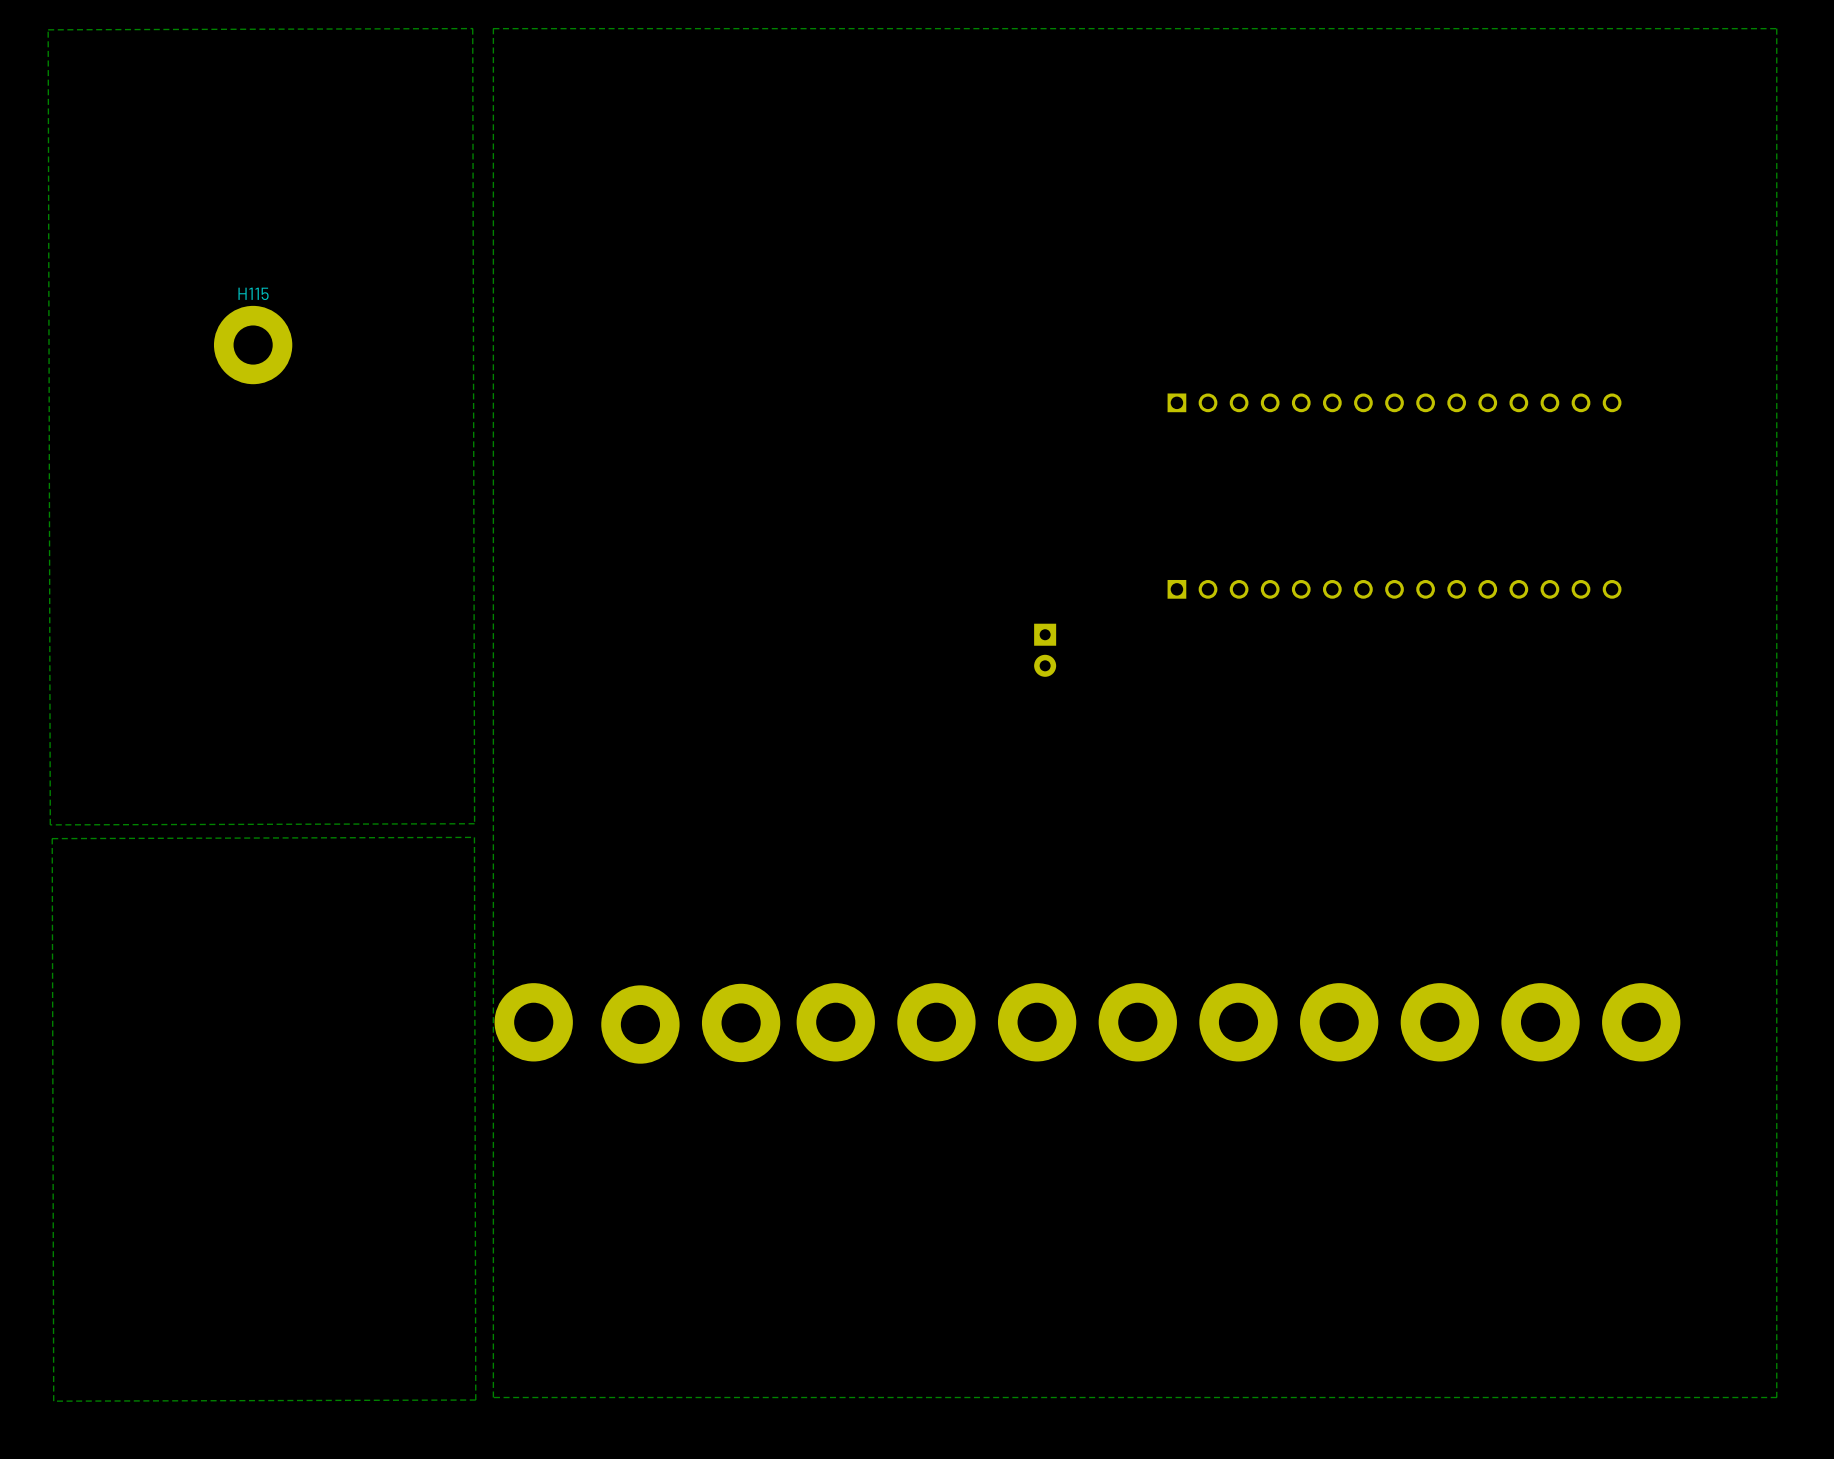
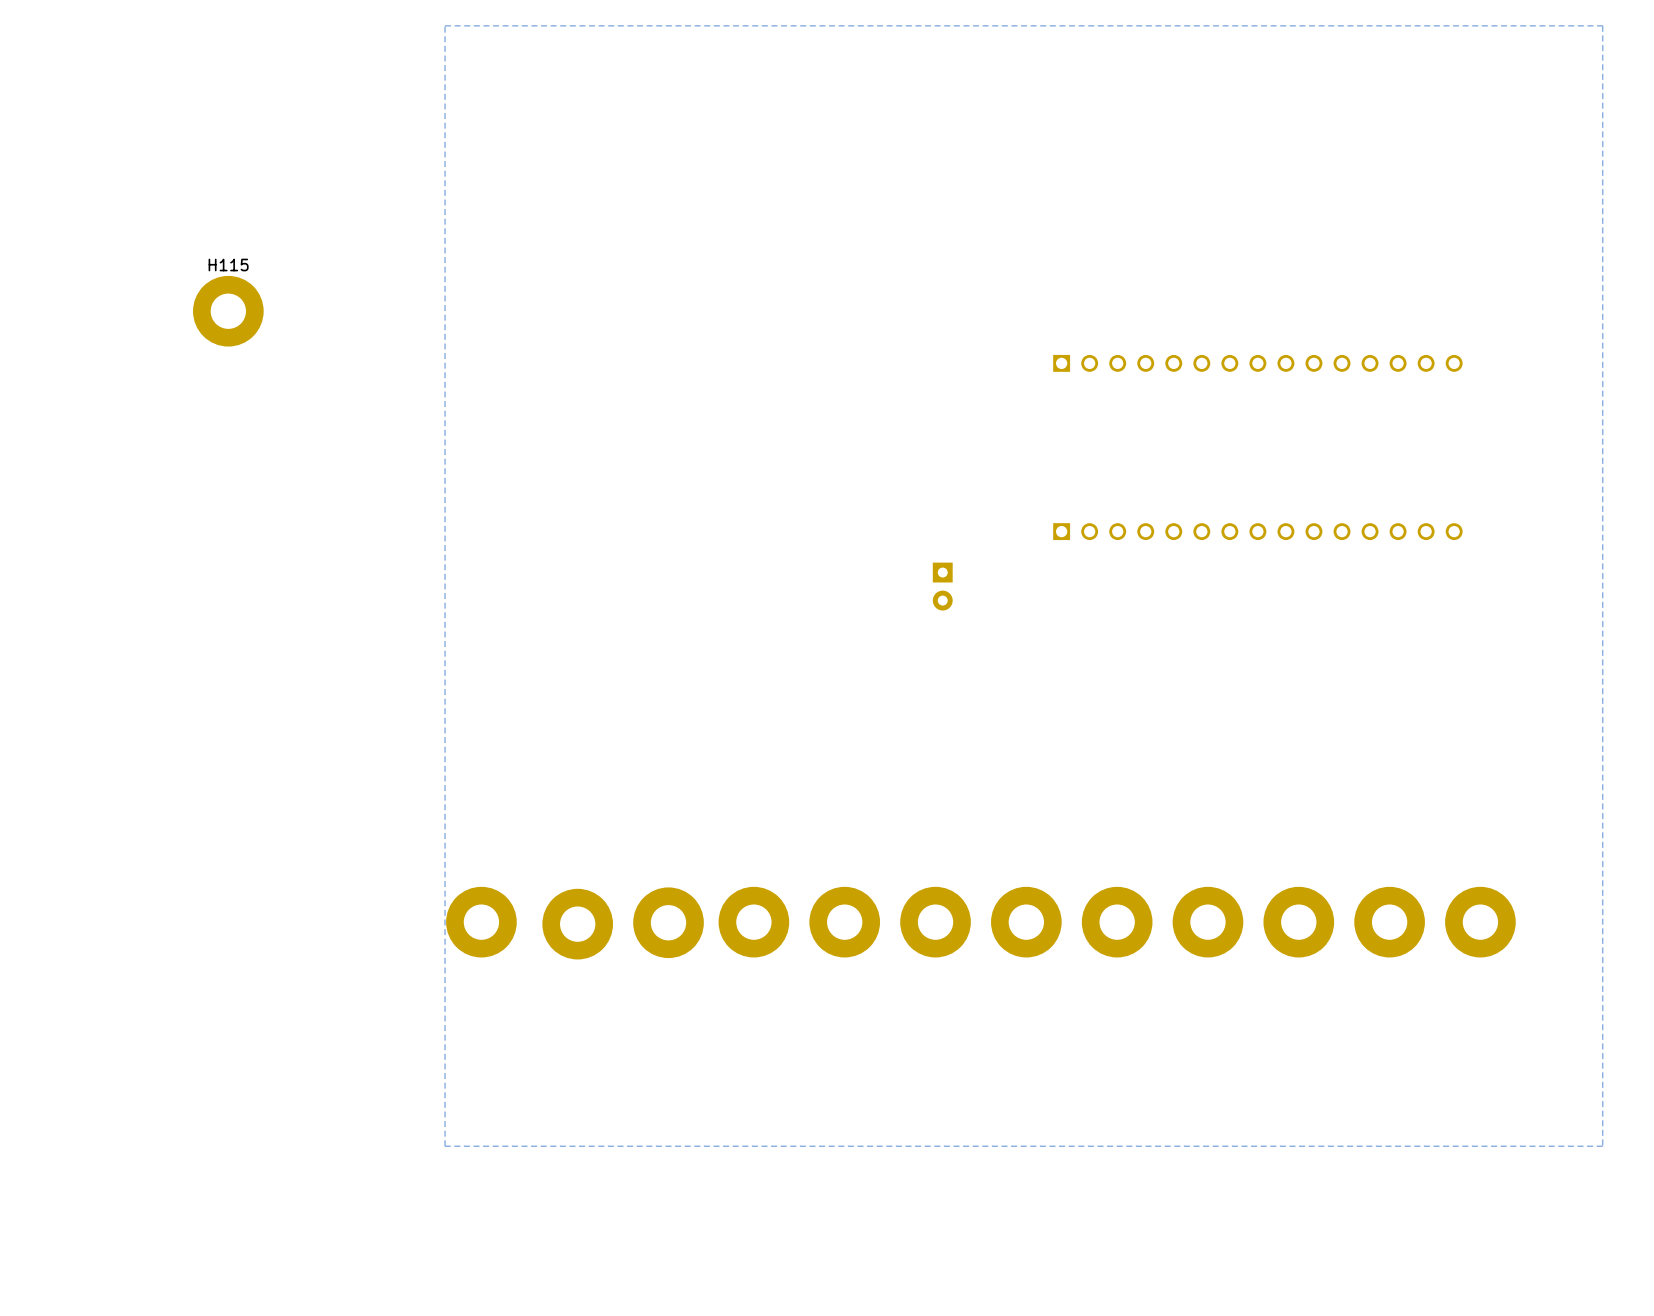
zone outline: (472, 28) (474, 823) (50, 824) (48, 29) (472, 28) -> none
zone outline: (474, 837) (475, 1400) (53, 1401) (52, 838) (474, 837) -> none
zone outline: (1776, 1270) (1776, 1397) (493, 1397) (493, 1270) -> (1602, 1146) (445, 1146)

